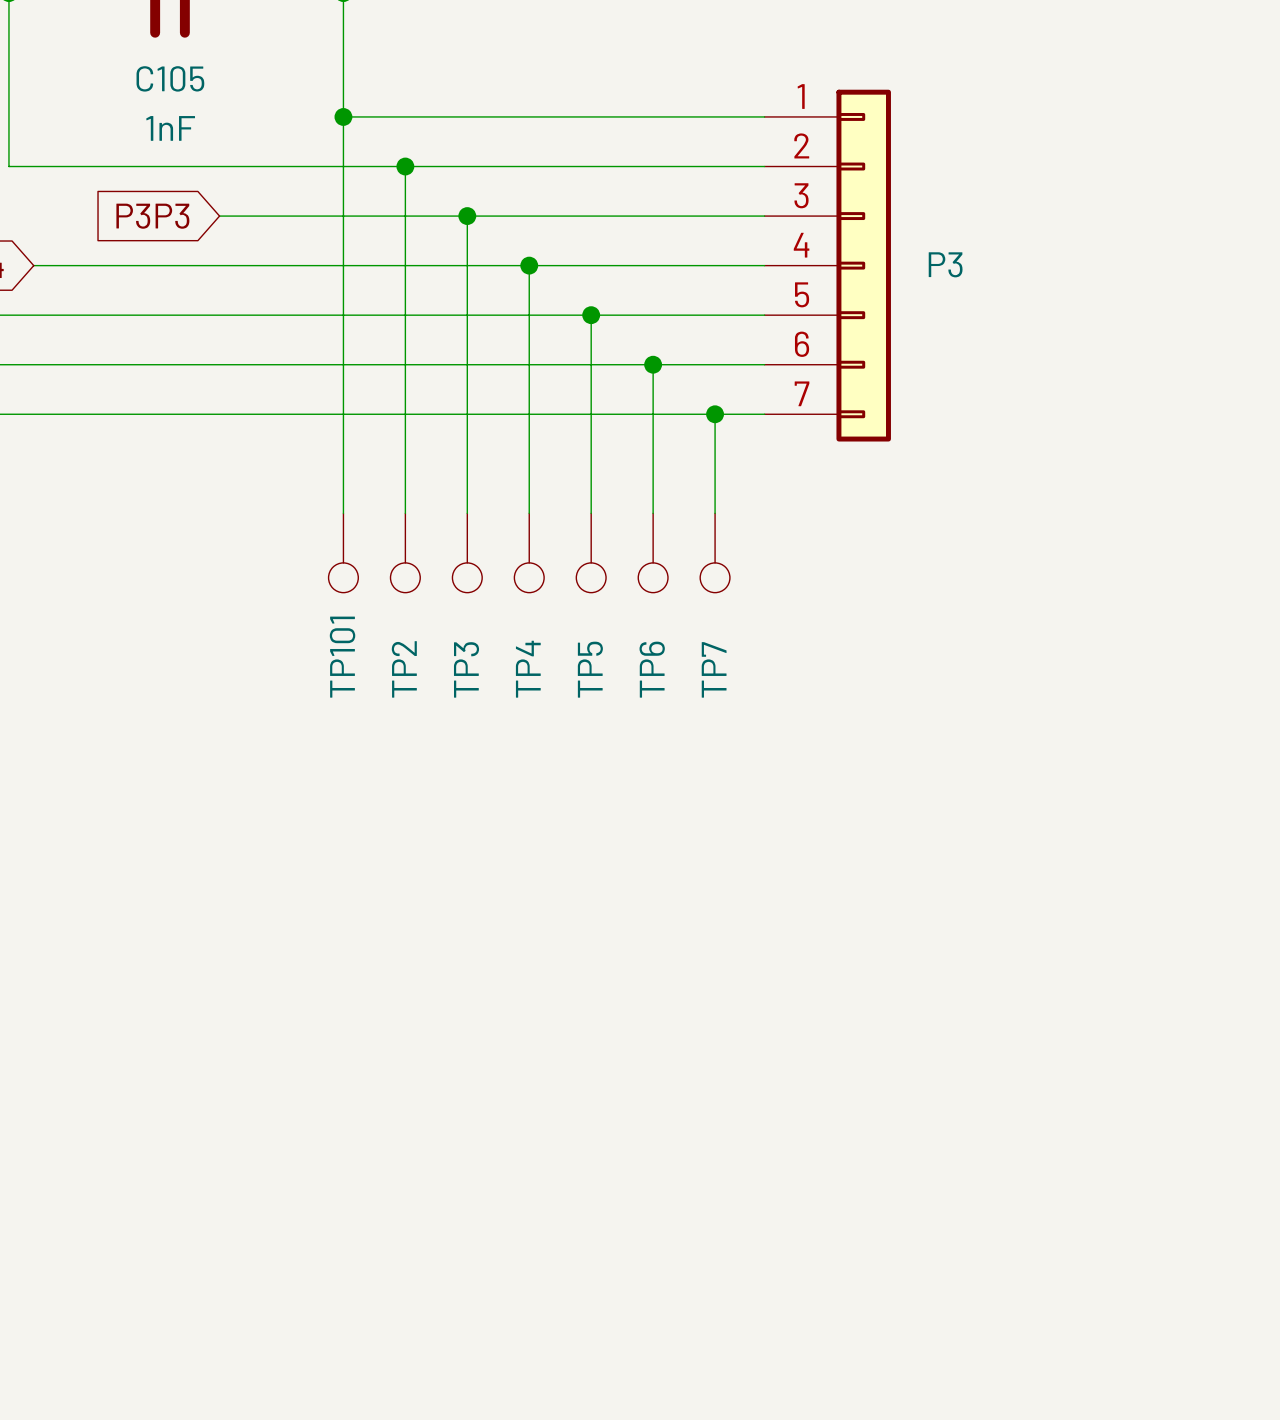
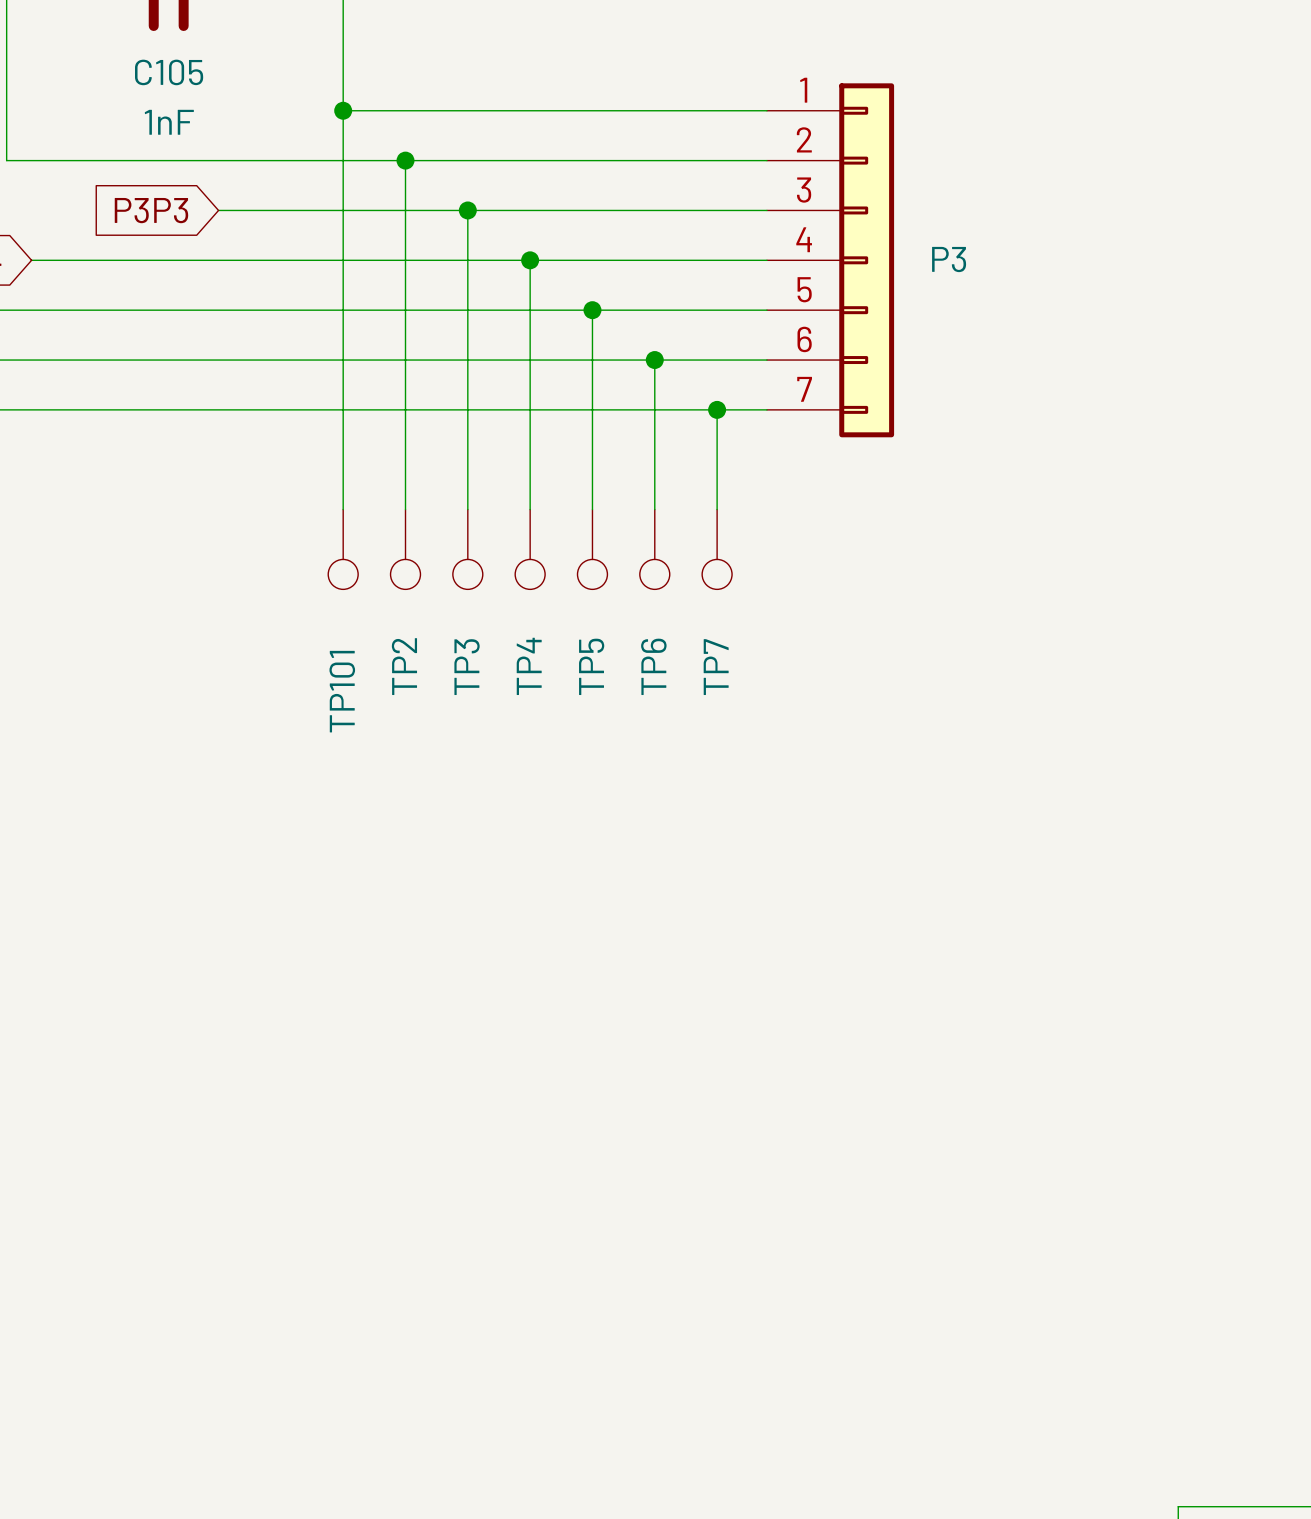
TP101 name position: TP101 (342, 657) -> TP101 (342, 691)

